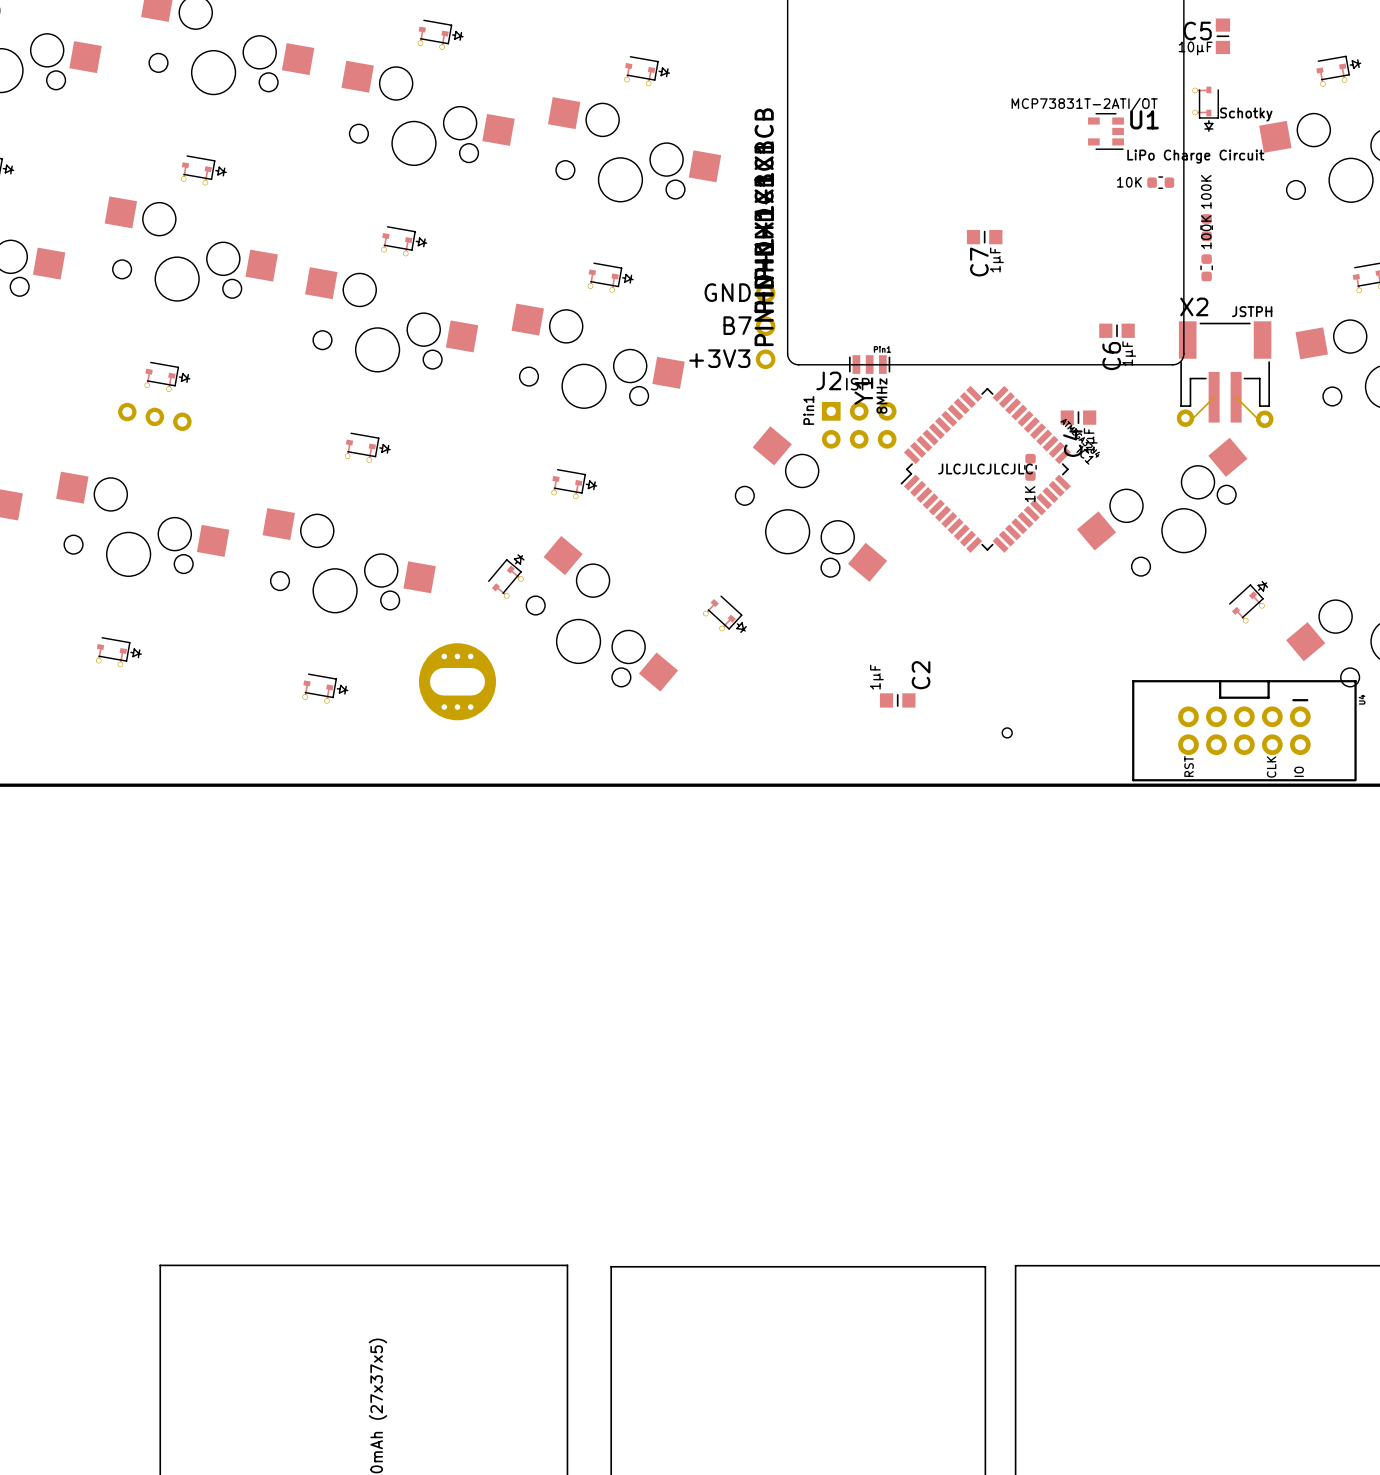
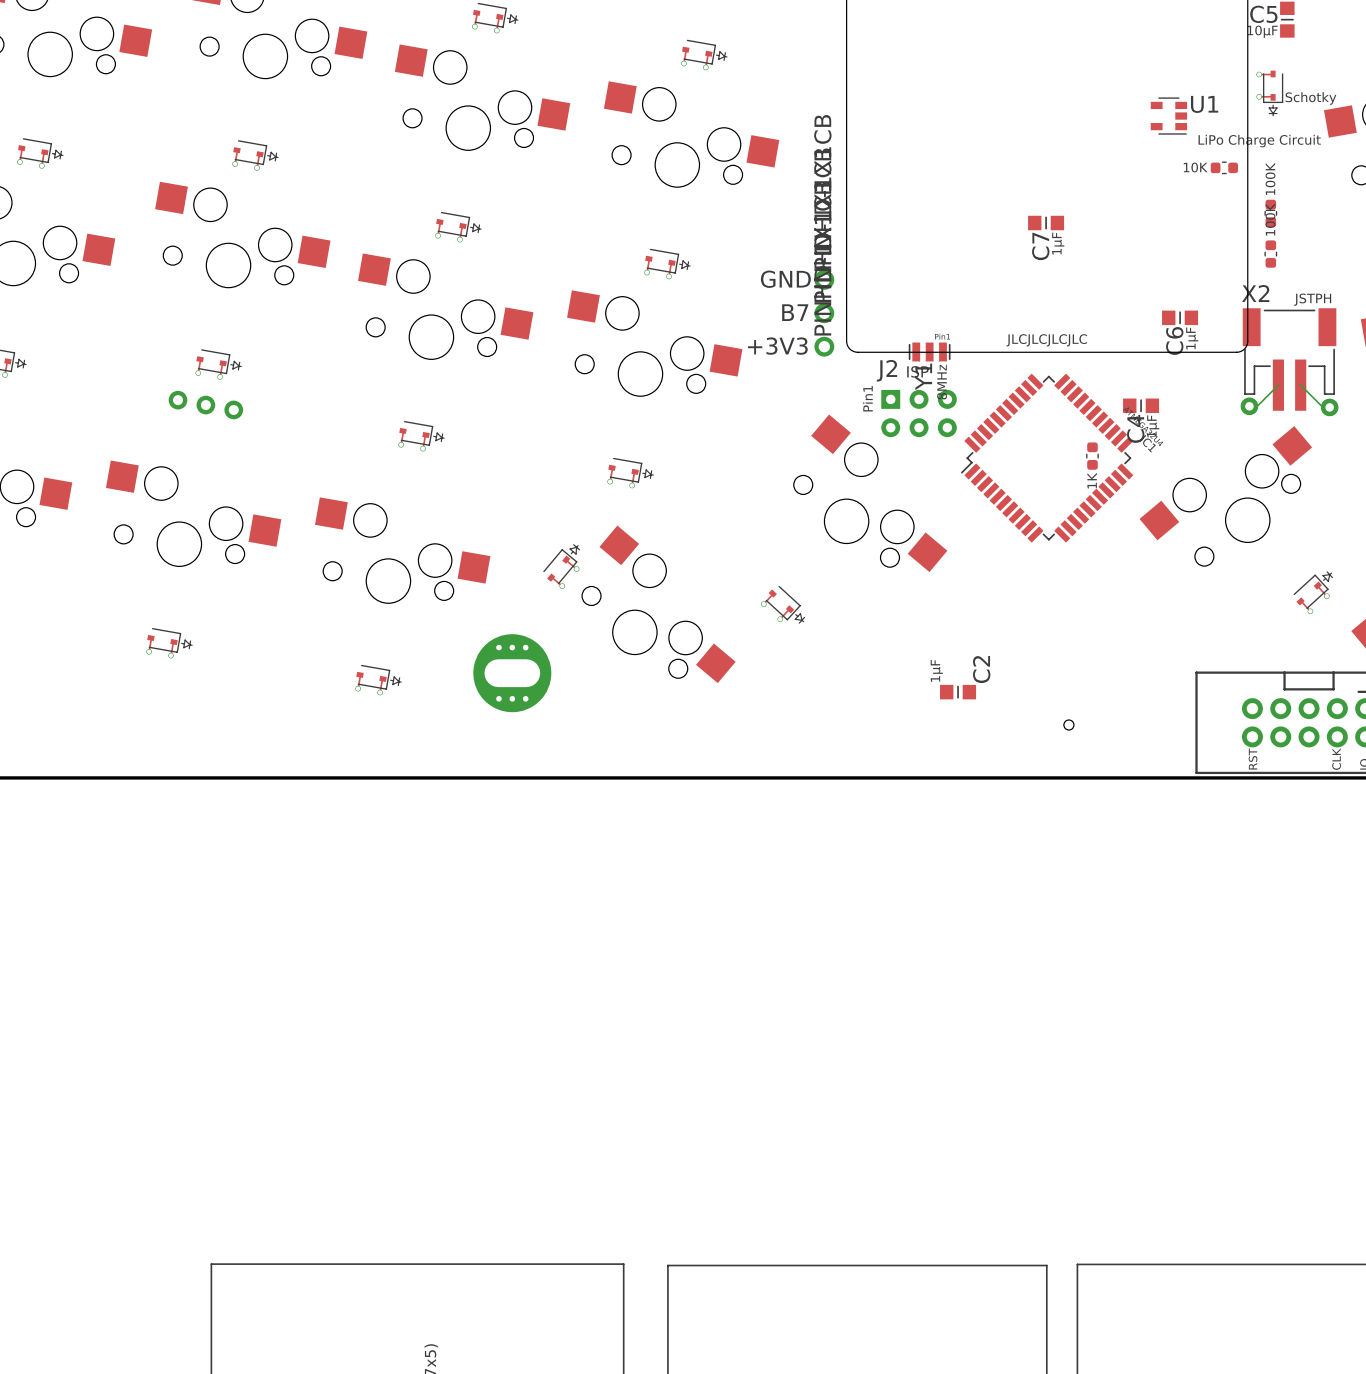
U1 value: MCP73831T-2ATI/OT (1084, 104) -> none
text position: JLCJLCJLCJLC (985, 468) -> JLCJLCJLCJLC (1046, 340)

